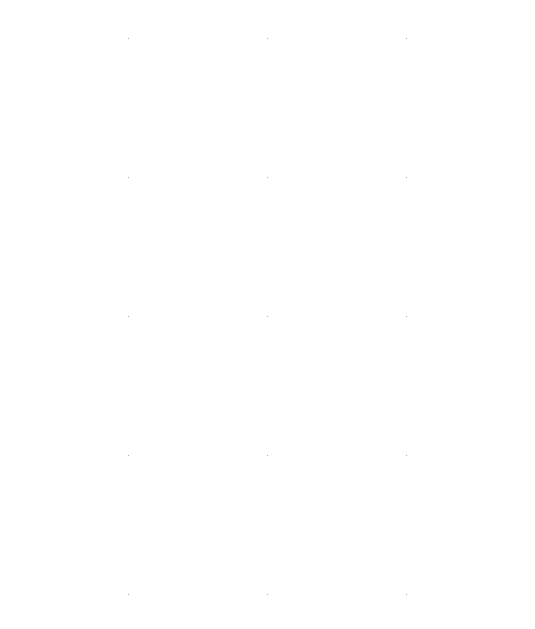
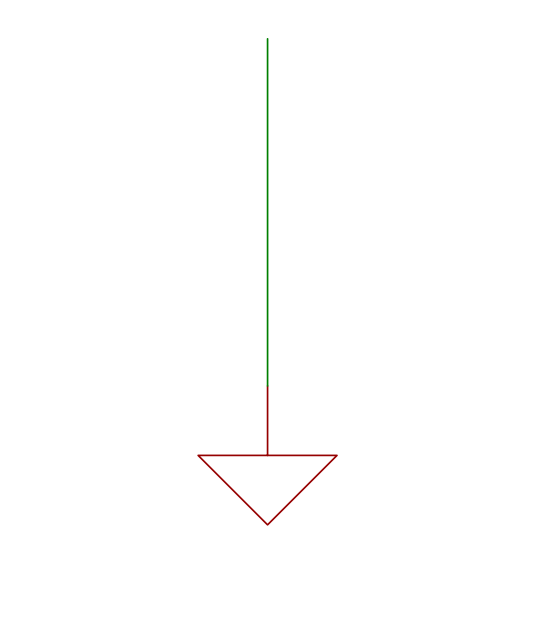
wire: none -> (267, 38) (267, 385)
power symbol: none -> (267, 455)

